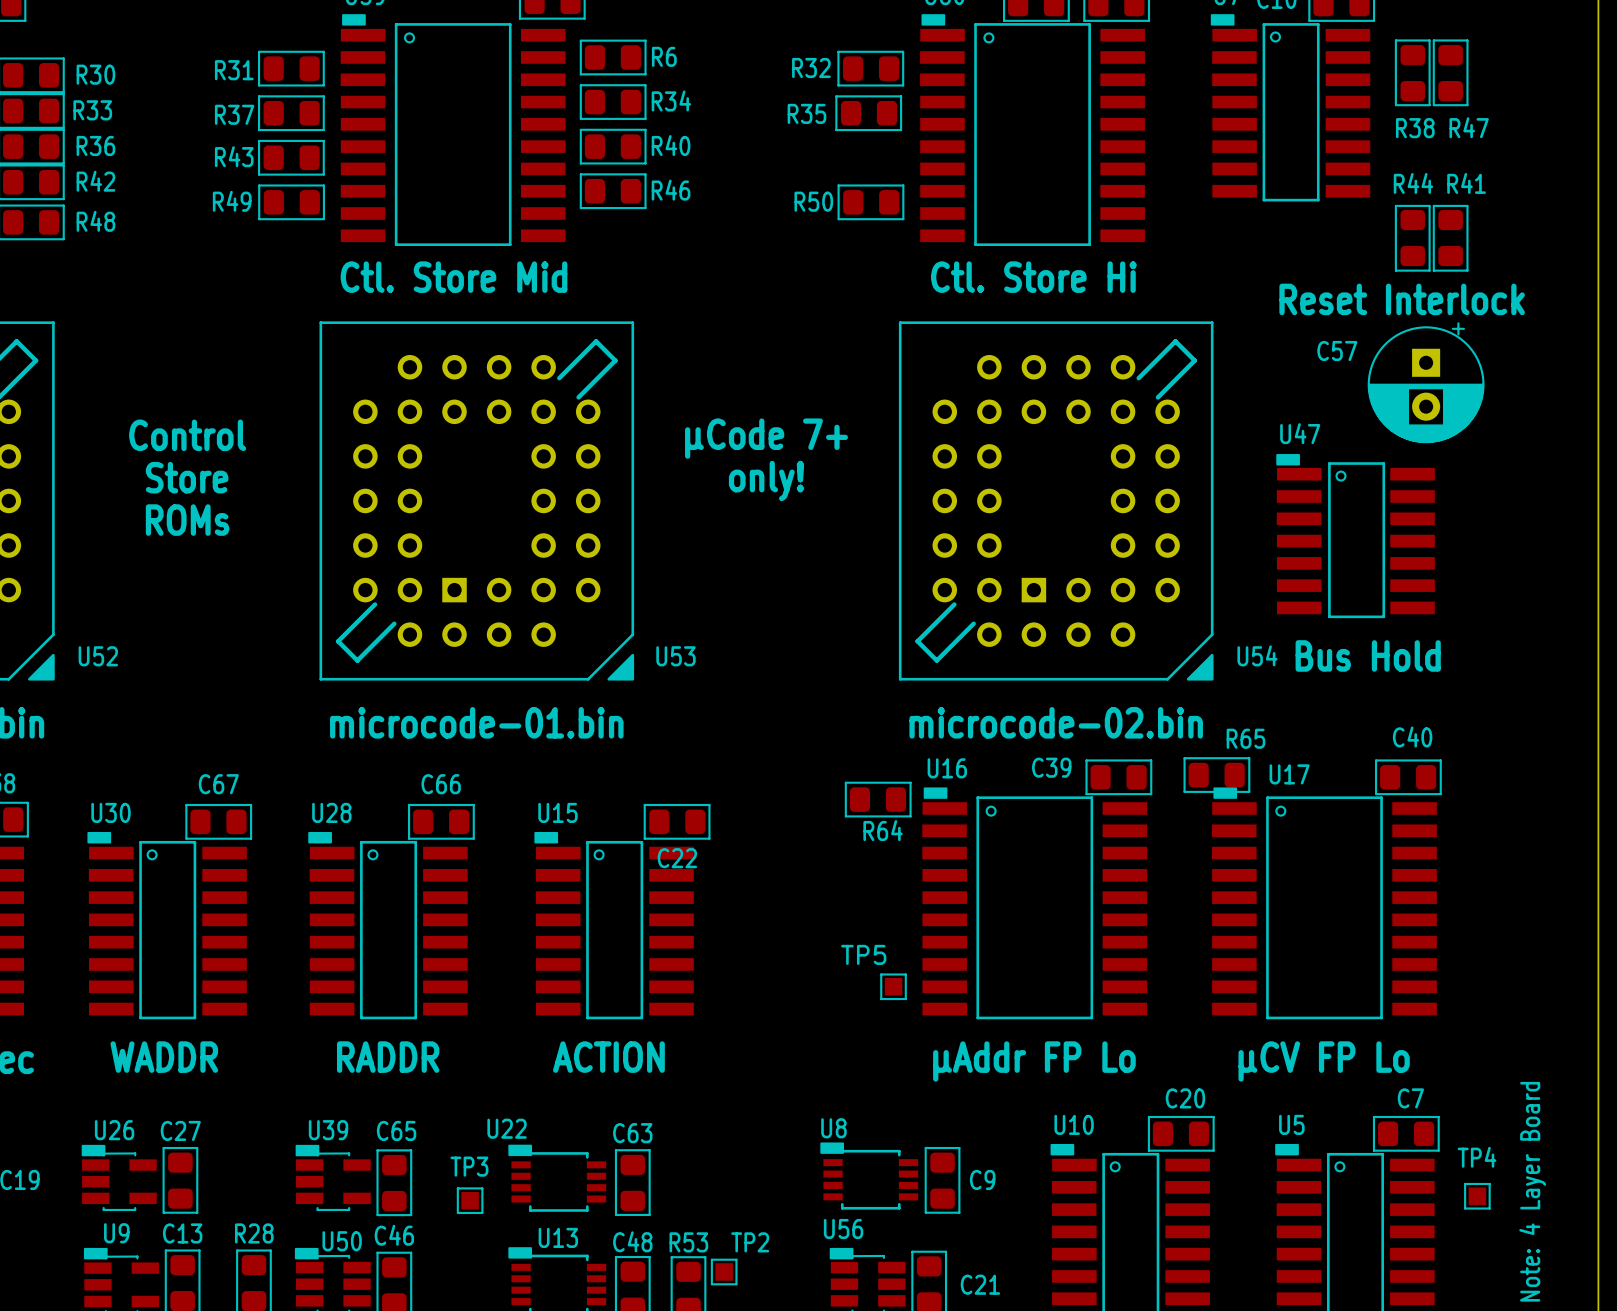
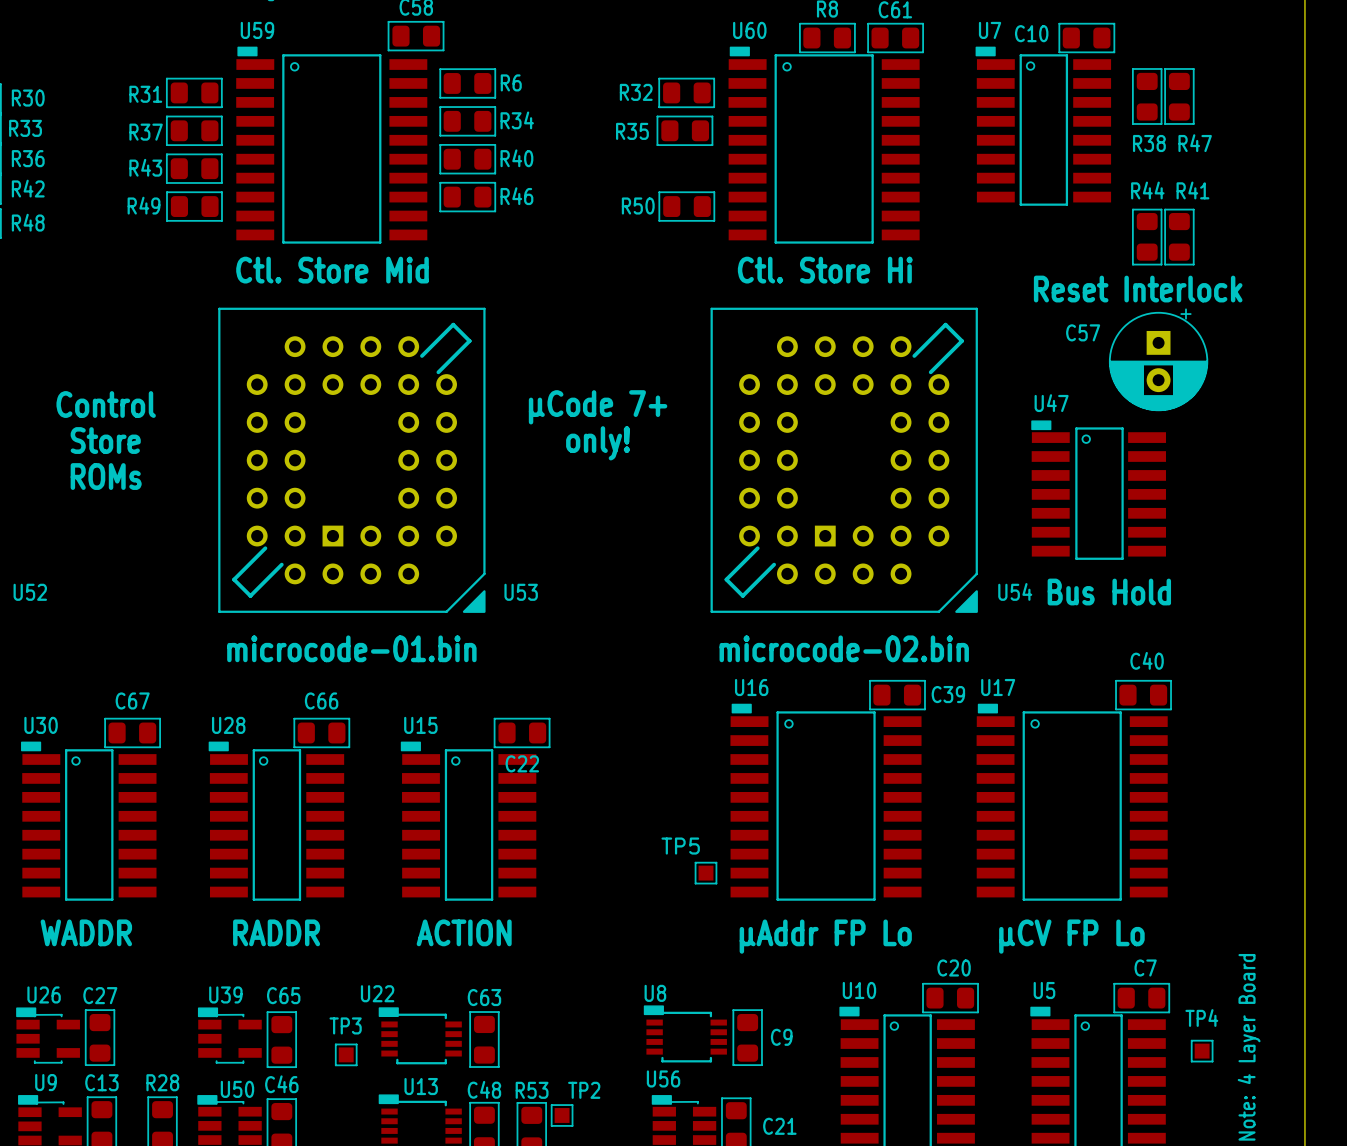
C39 name position: C39 (1051, 767) -> C39 (948, 694)
U17 name position: U17 (1289, 774) -> U17 (998, 687)
R65: (1216, 775) -> none
R64: (878, 799) -> none

